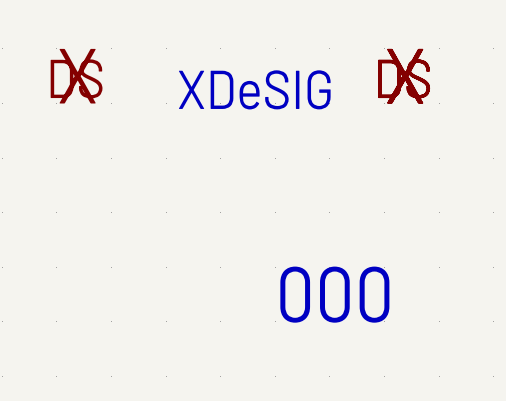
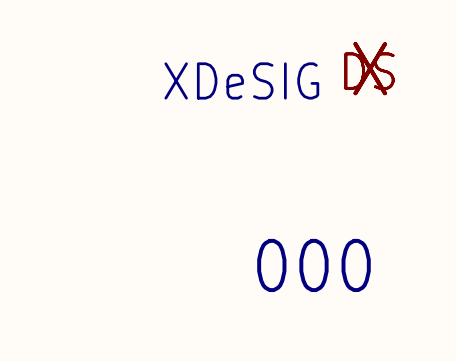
part: (76, 76) -> none

